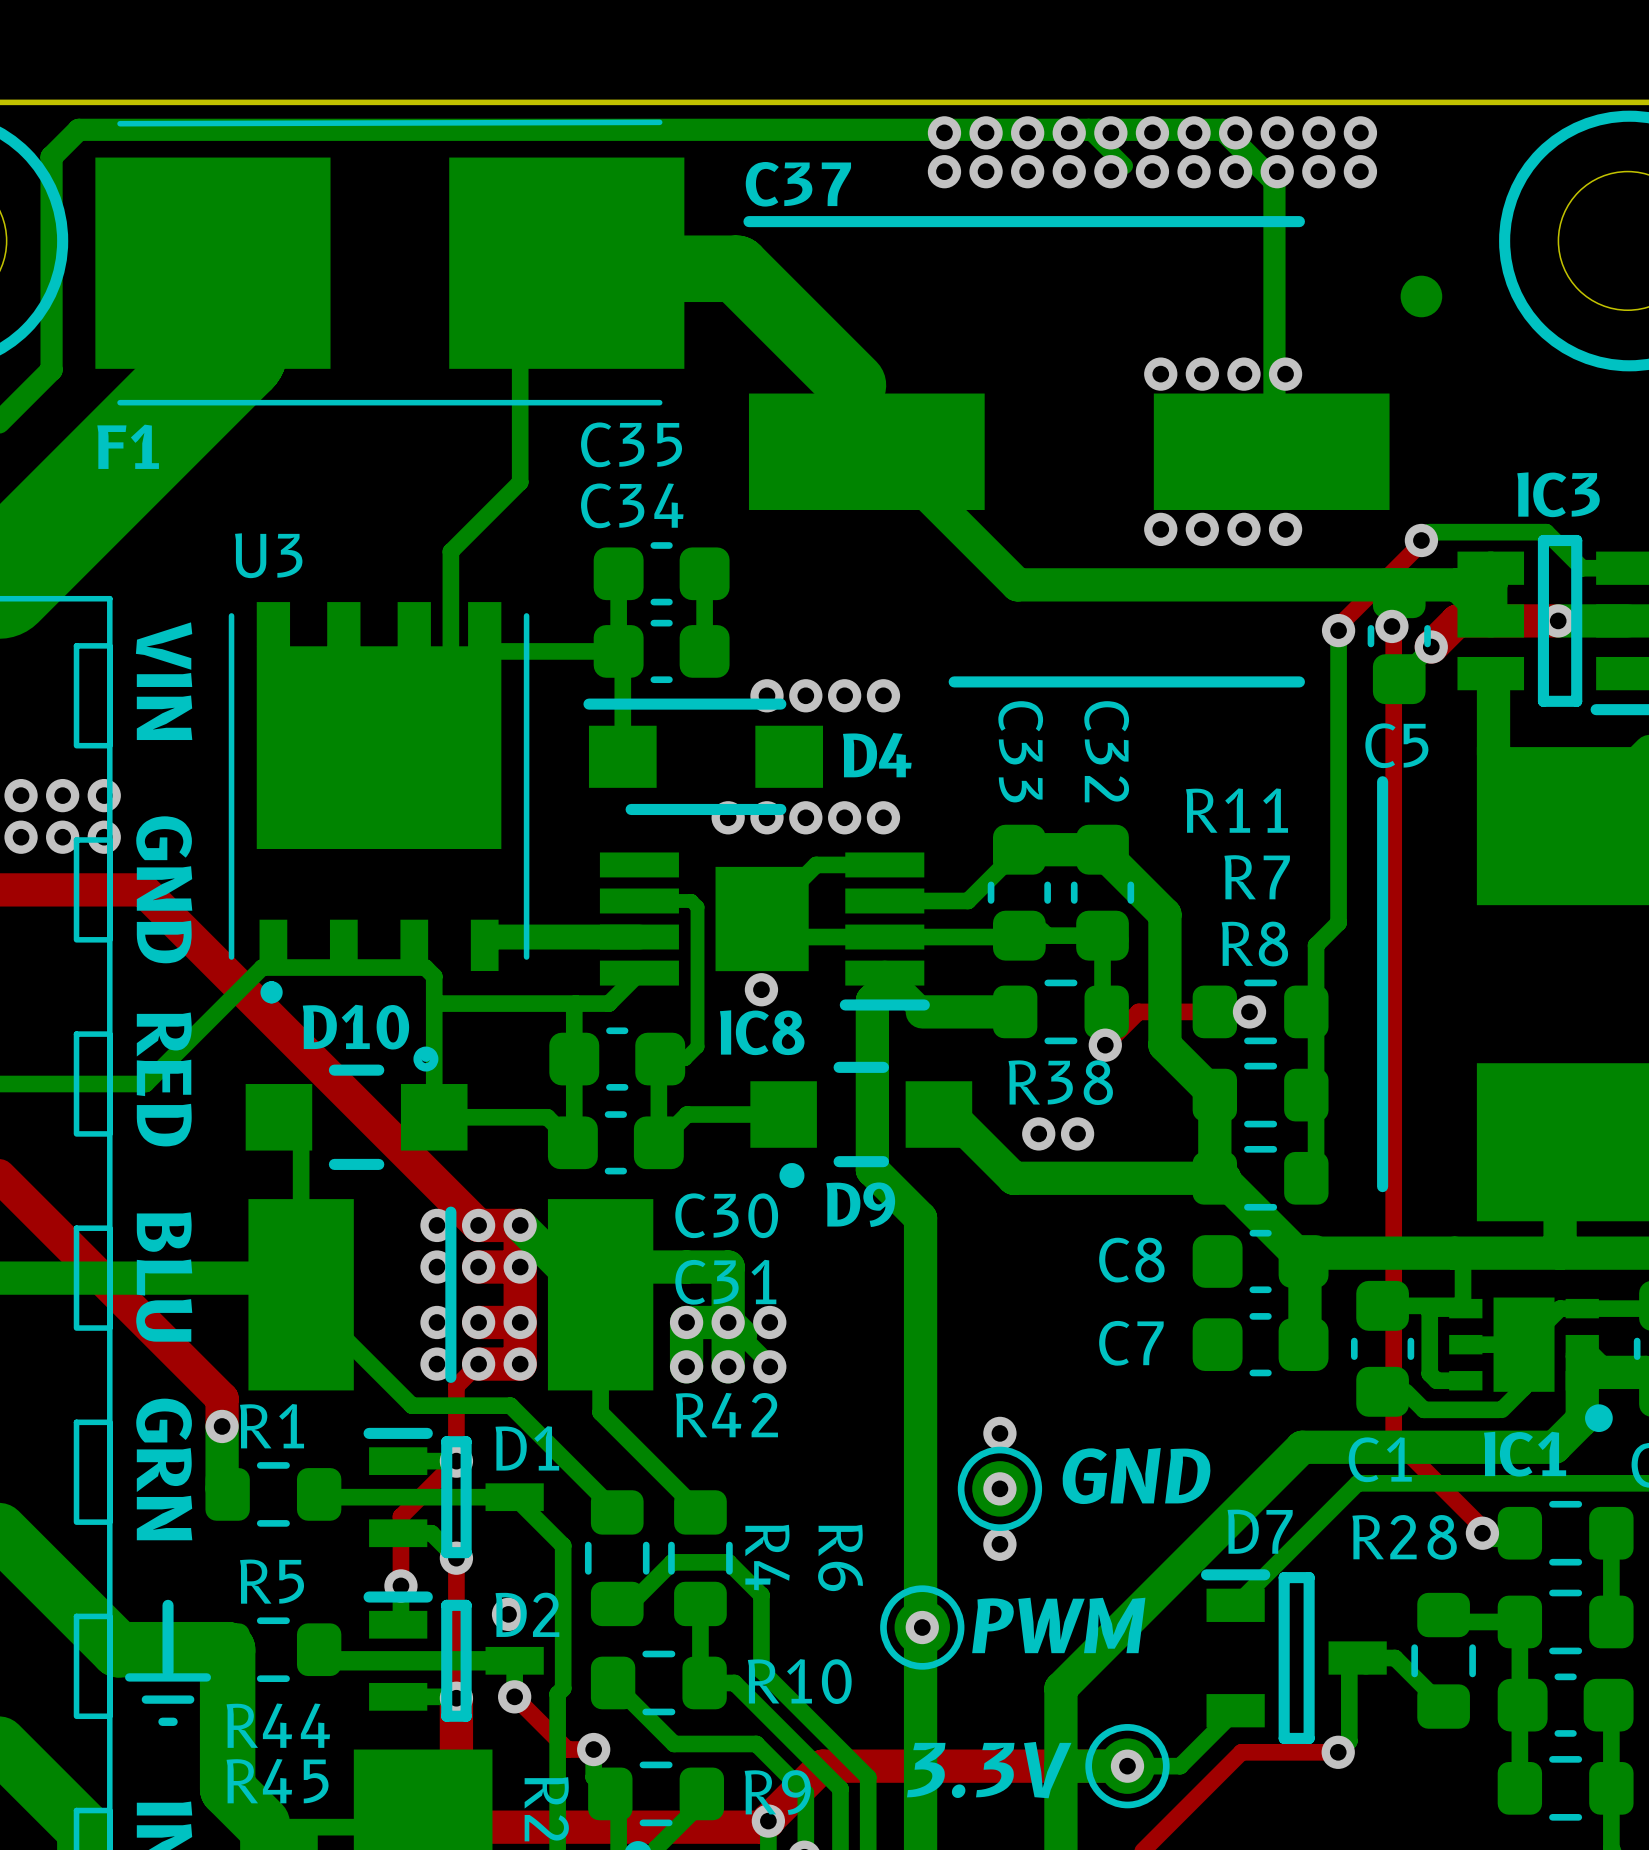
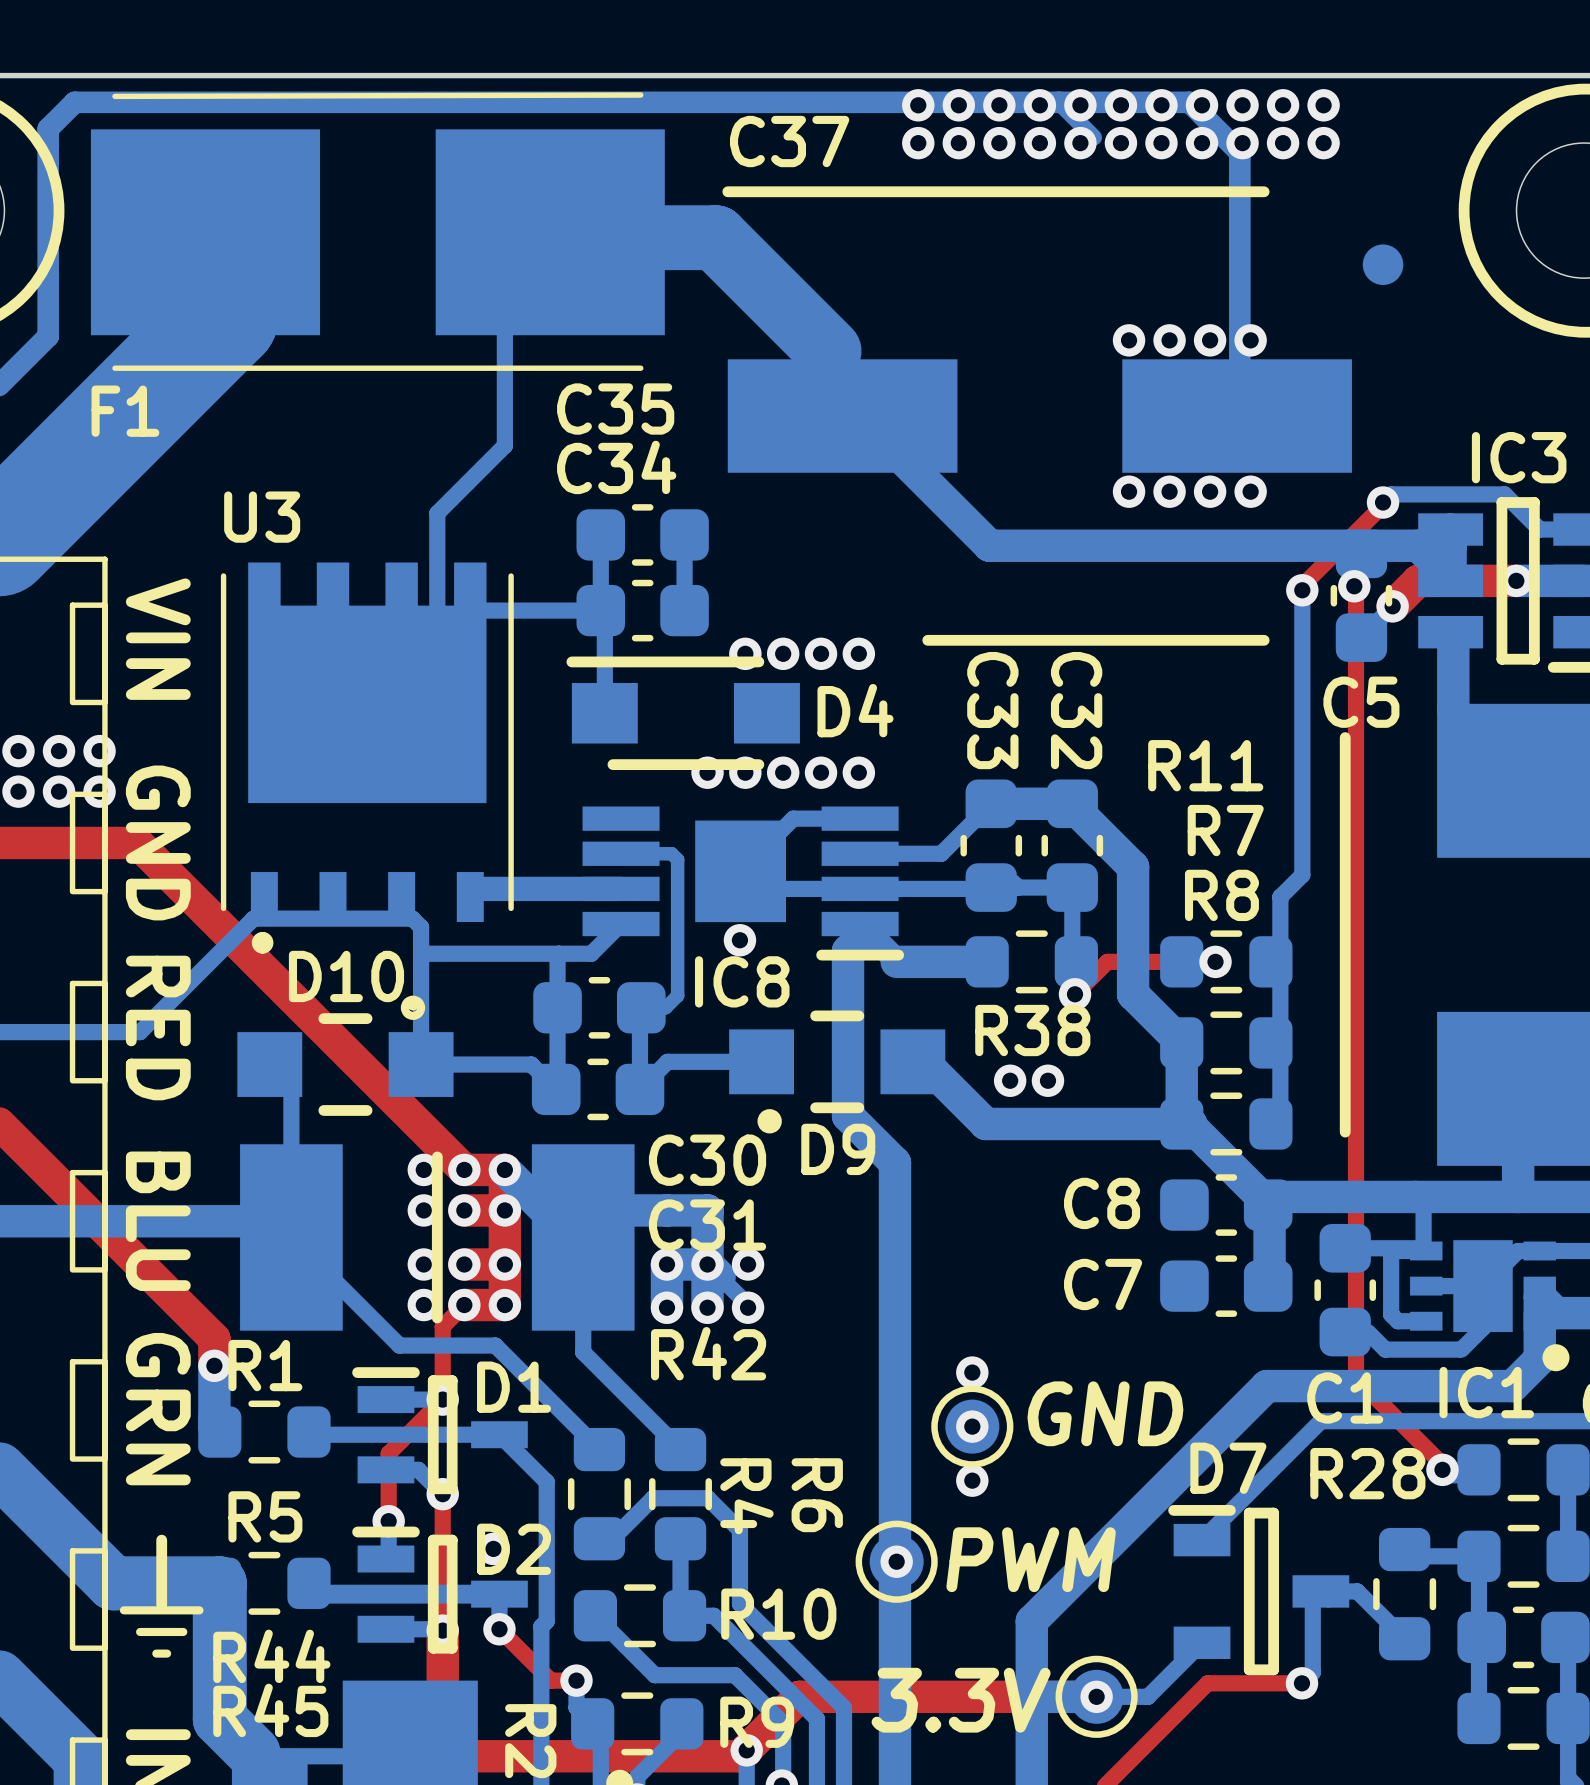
C37 name position: C37 (798, 184) -> C37 (789, 141)

